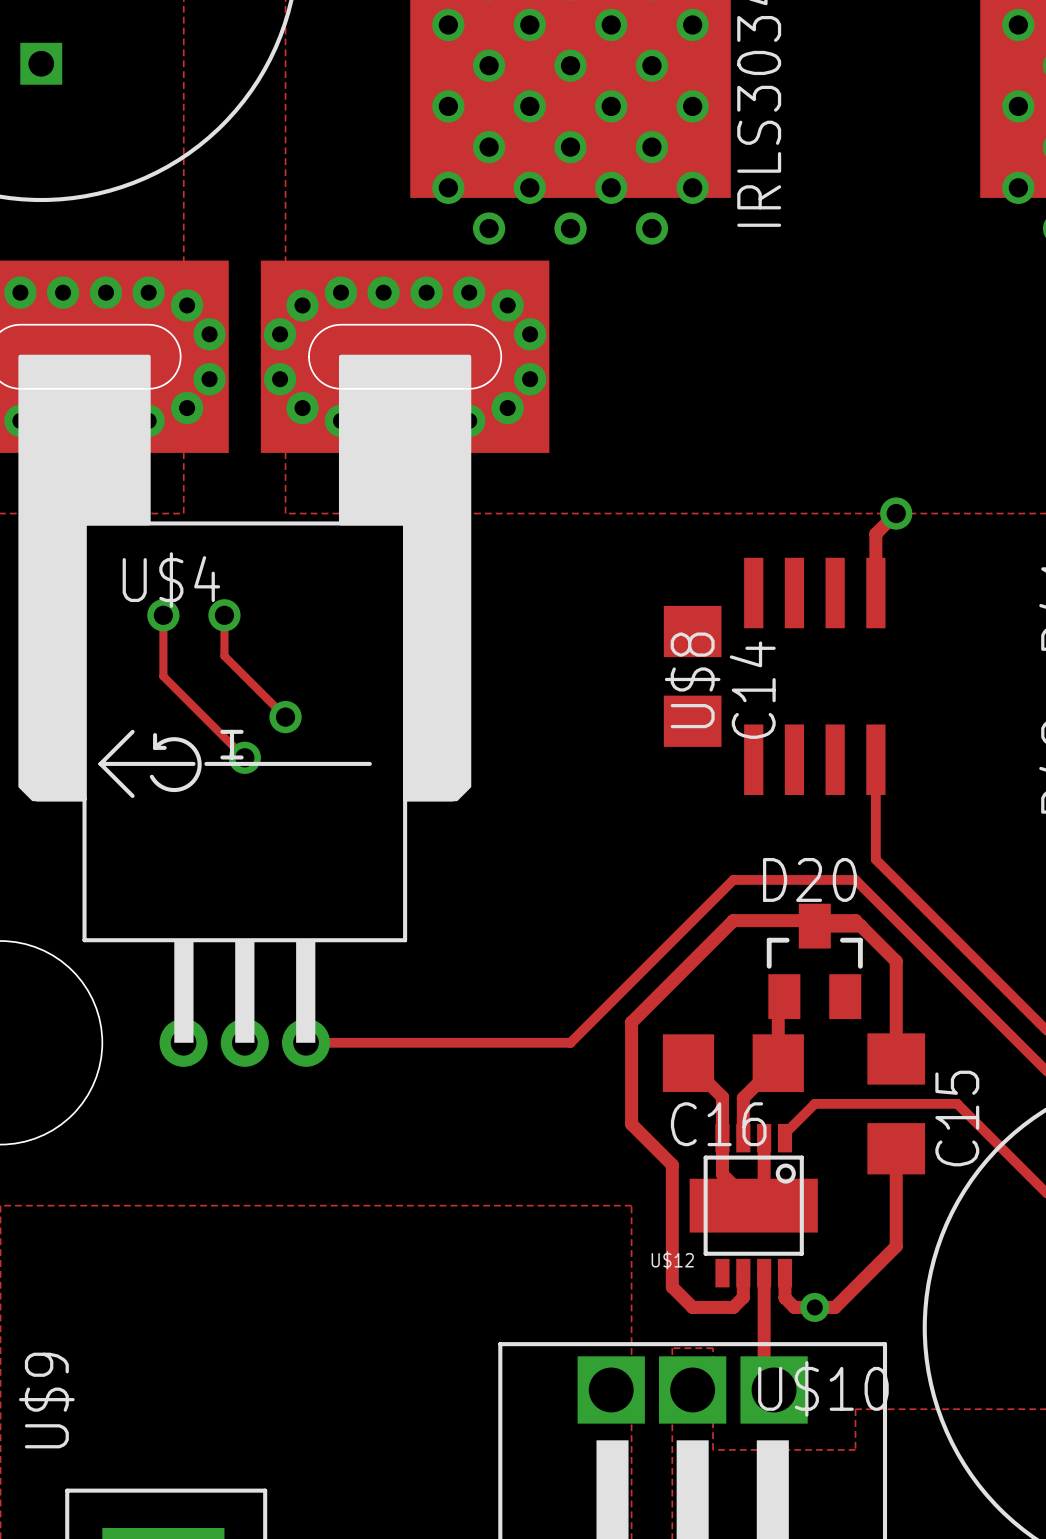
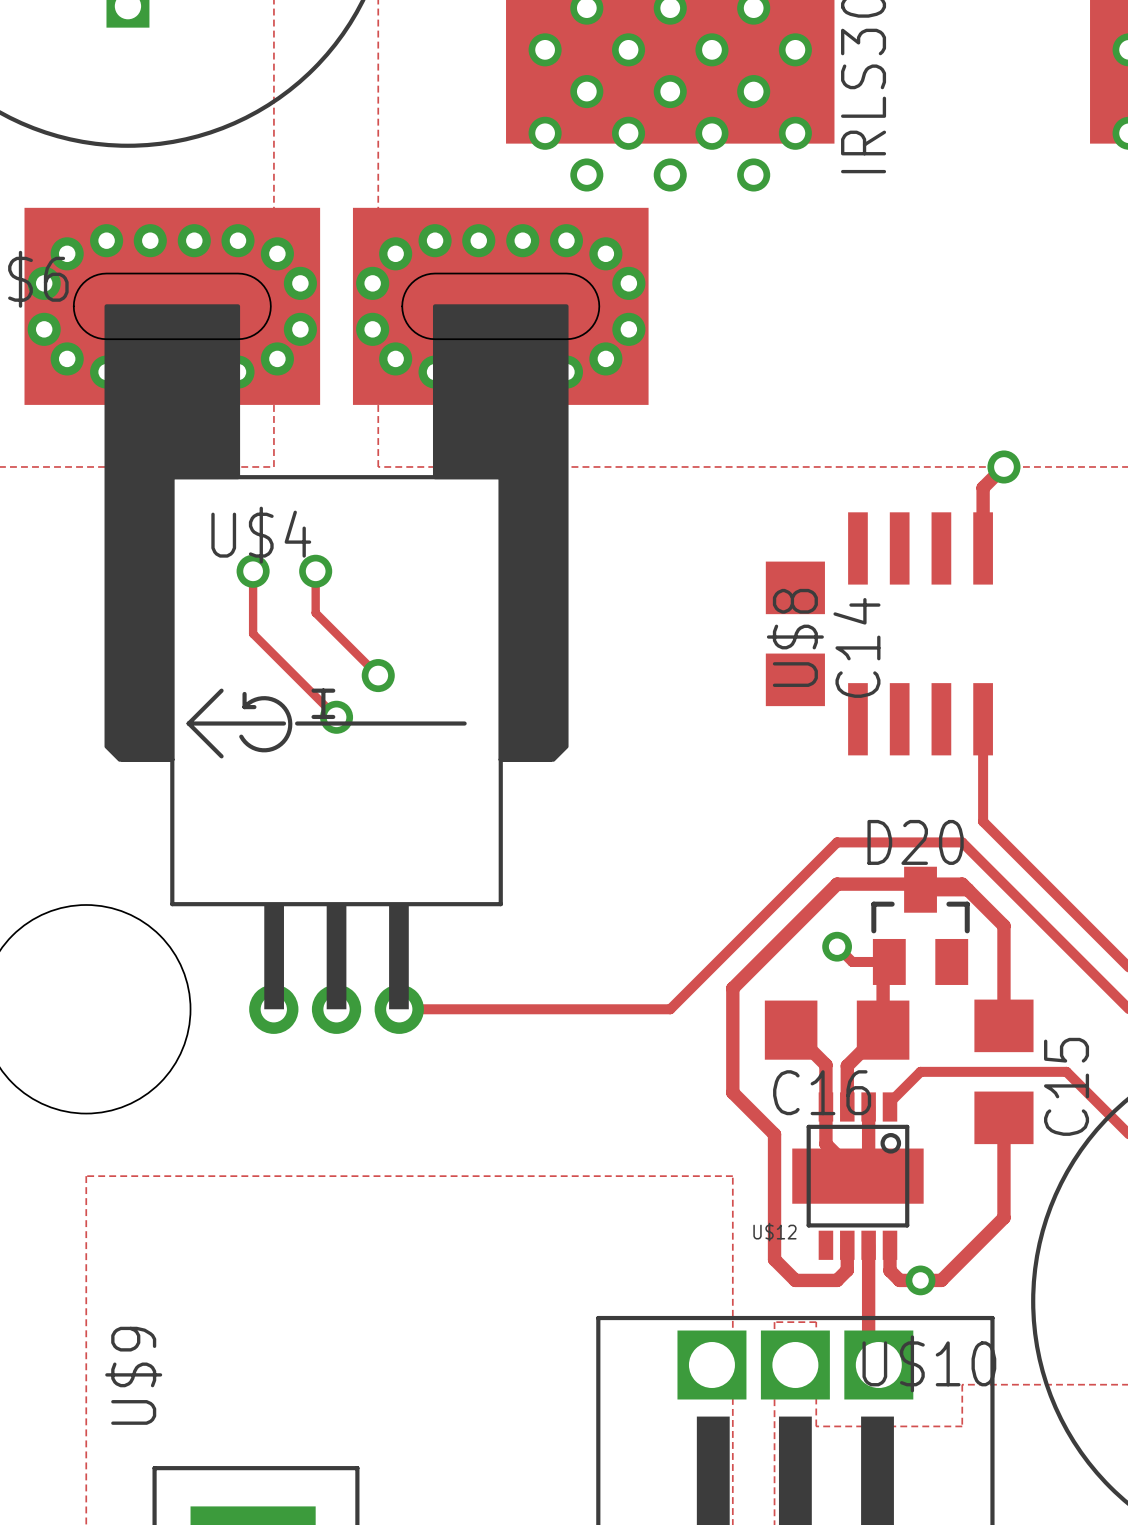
track: none -> (837, 946) (852, 961) (889, 961)
via: none -> (837, 946)

